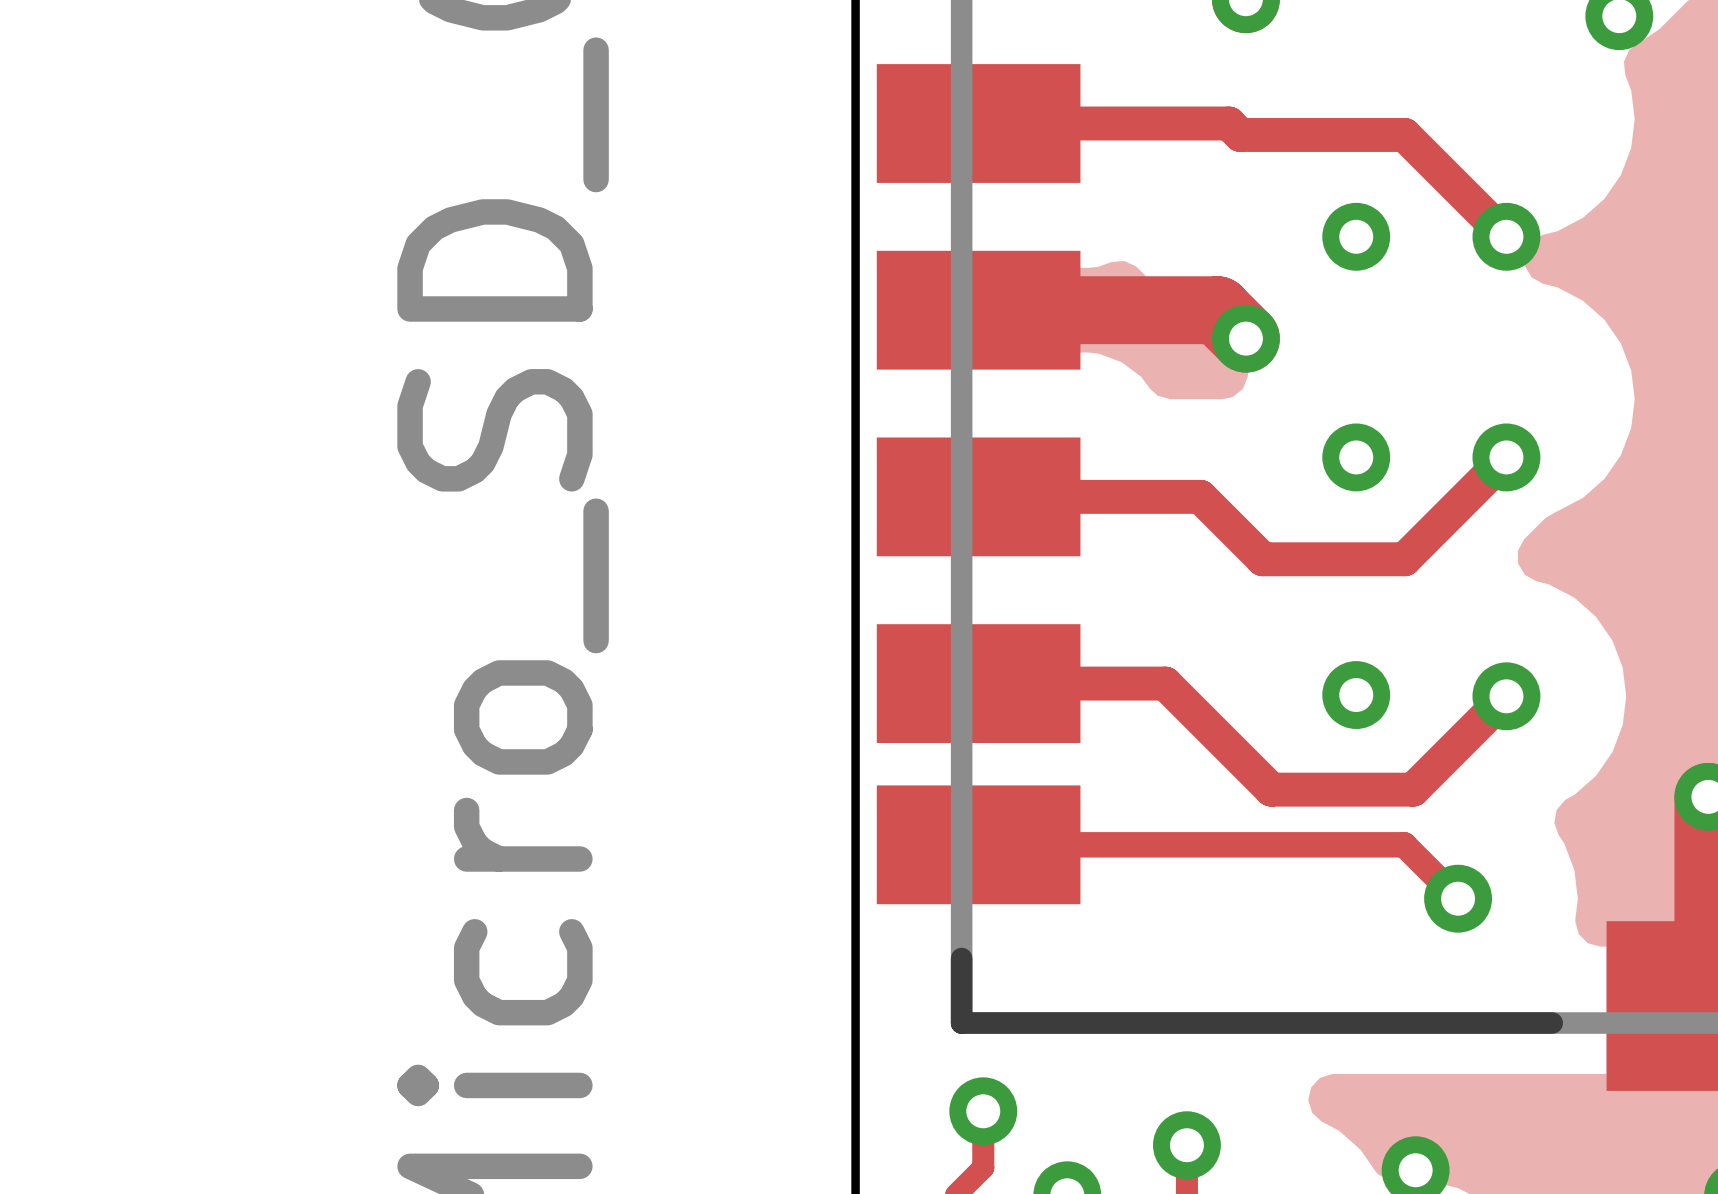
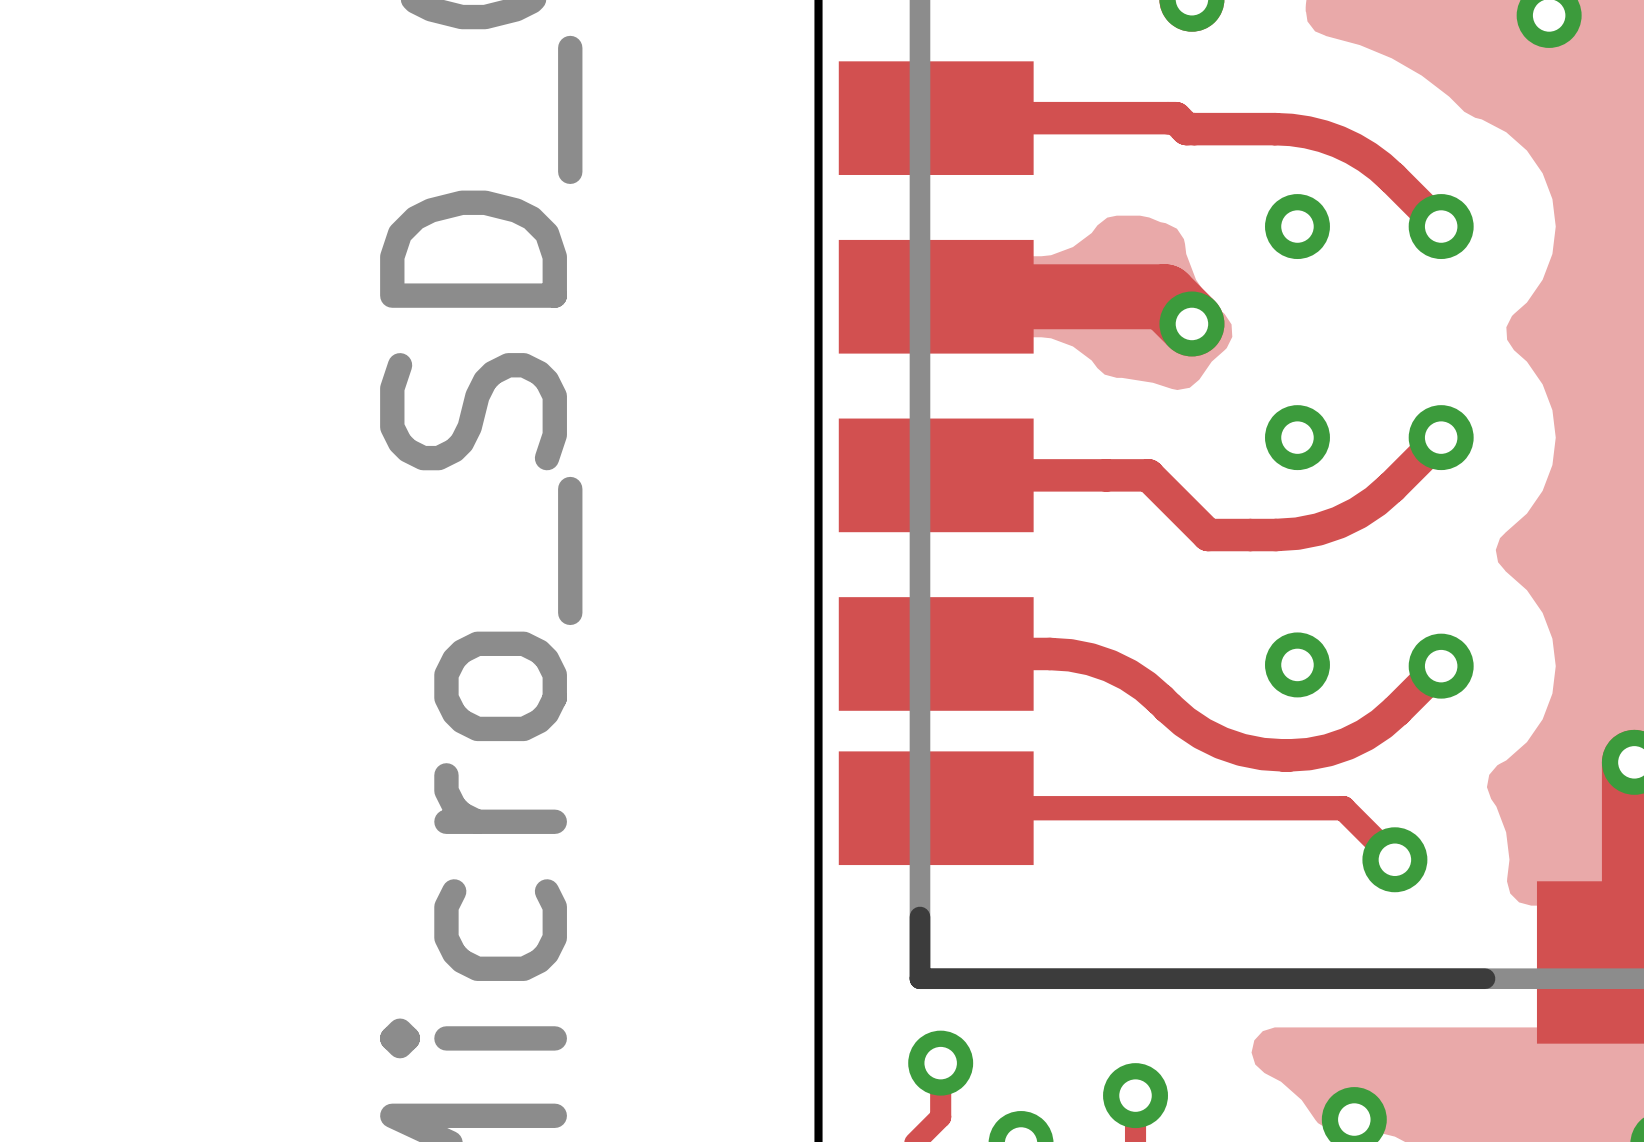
track: (1332, 134) (1404, 134) (1455, 185) -> (1274, 129) (1307, 132) (1338, 141) (1367, 157) (1392, 177)
track: (1454, 509) (1404, 559) (1333, 559) -> (1391, 487) (1357, 513) (1338, 522) (1318, 529) (1275, 535)
track: (1097, 683) (1165, 683) (1213, 731) -> (1049, 653) (1090, 659) (1109, 665) (1145, 686) (1160, 699)
track: (1221, 739) (1271, 789) (1342, 789) -> (1168, 707) (1202, 733) (1221, 742) (1241, 749) (1284, 755)
track: (1459, 742) (1413, 789) (1347, 789) -> (1396, 710) (1364, 735) (1347, 743) (1328, 750) (1288, 755)

